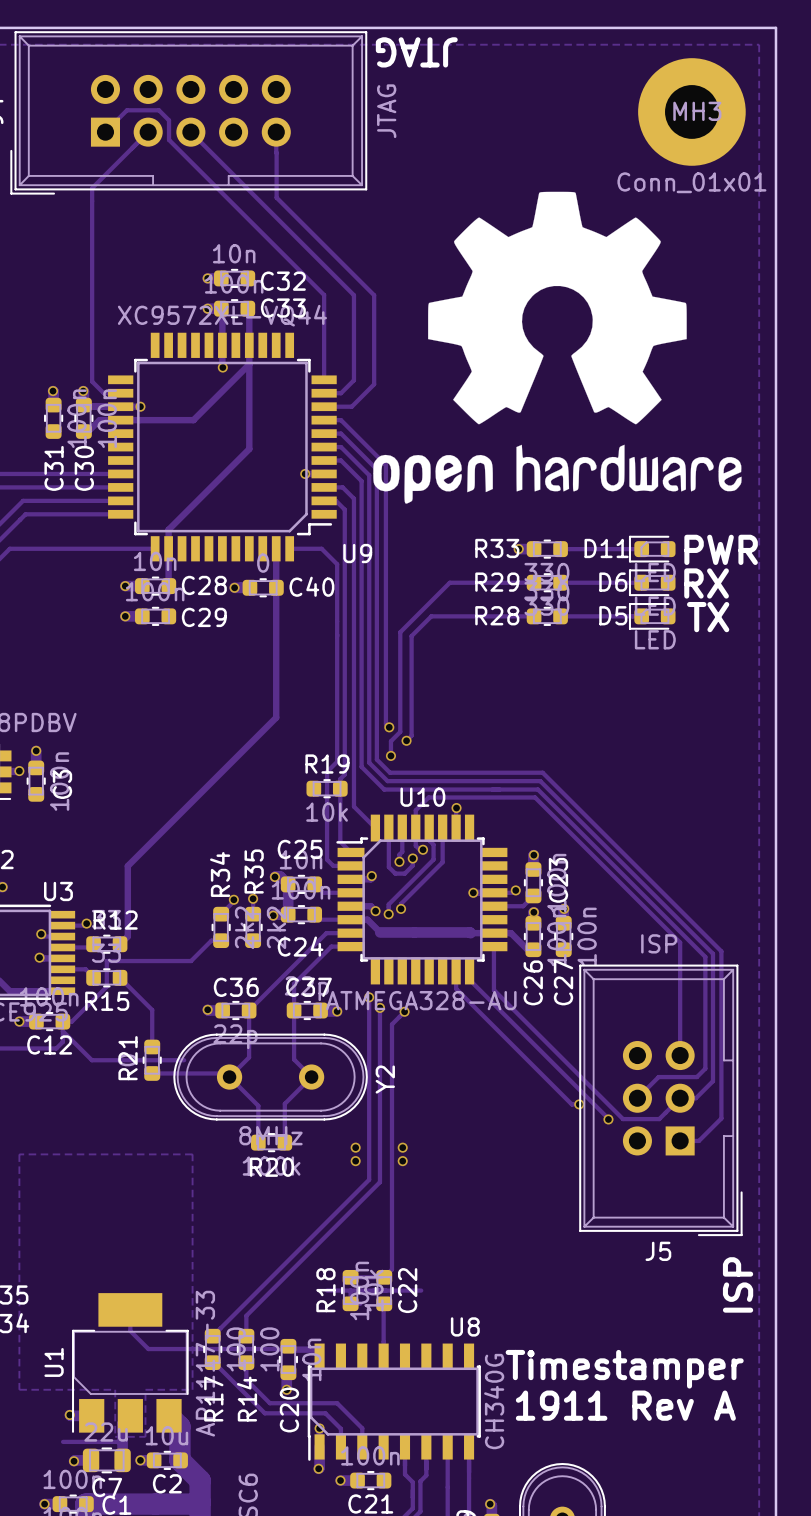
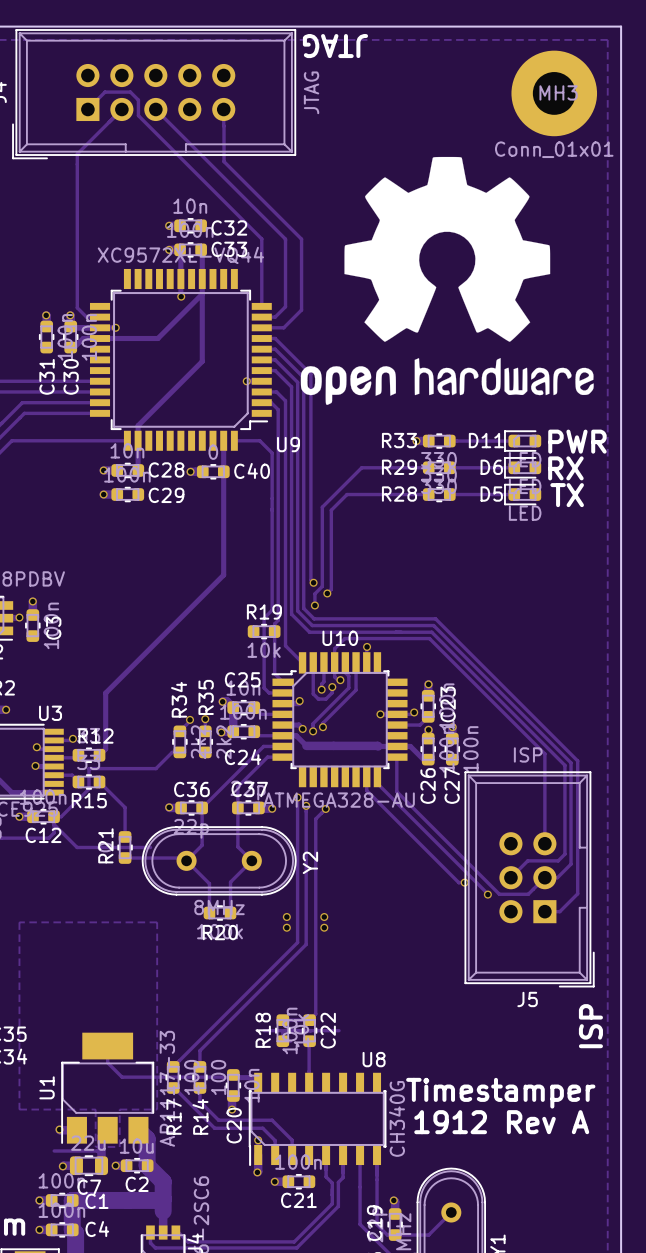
text: 1911 Rev A (625, 1405) -> 1912 Rev A (501, 1122)

